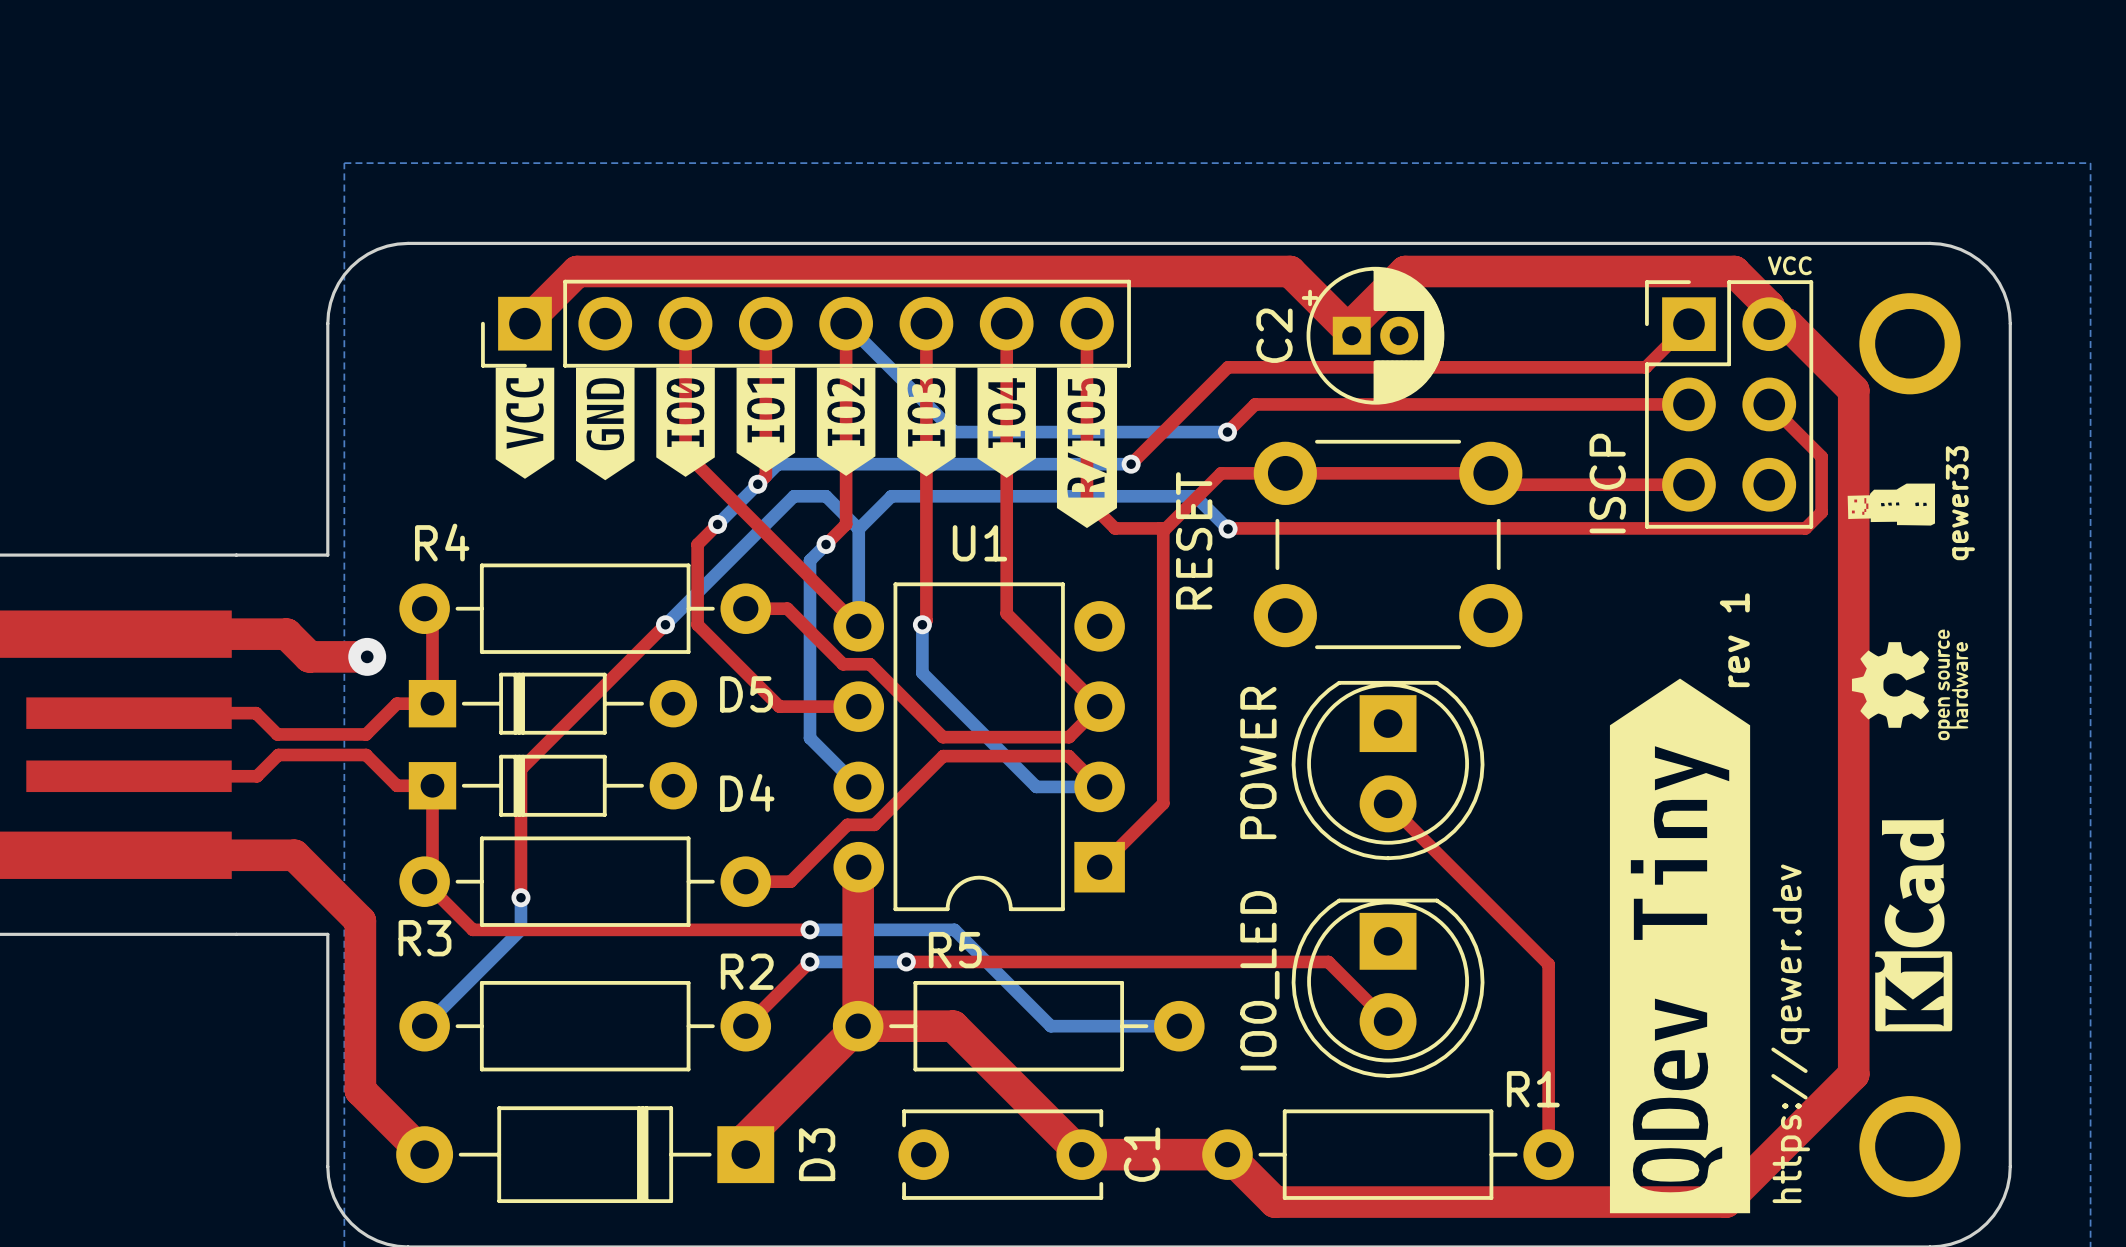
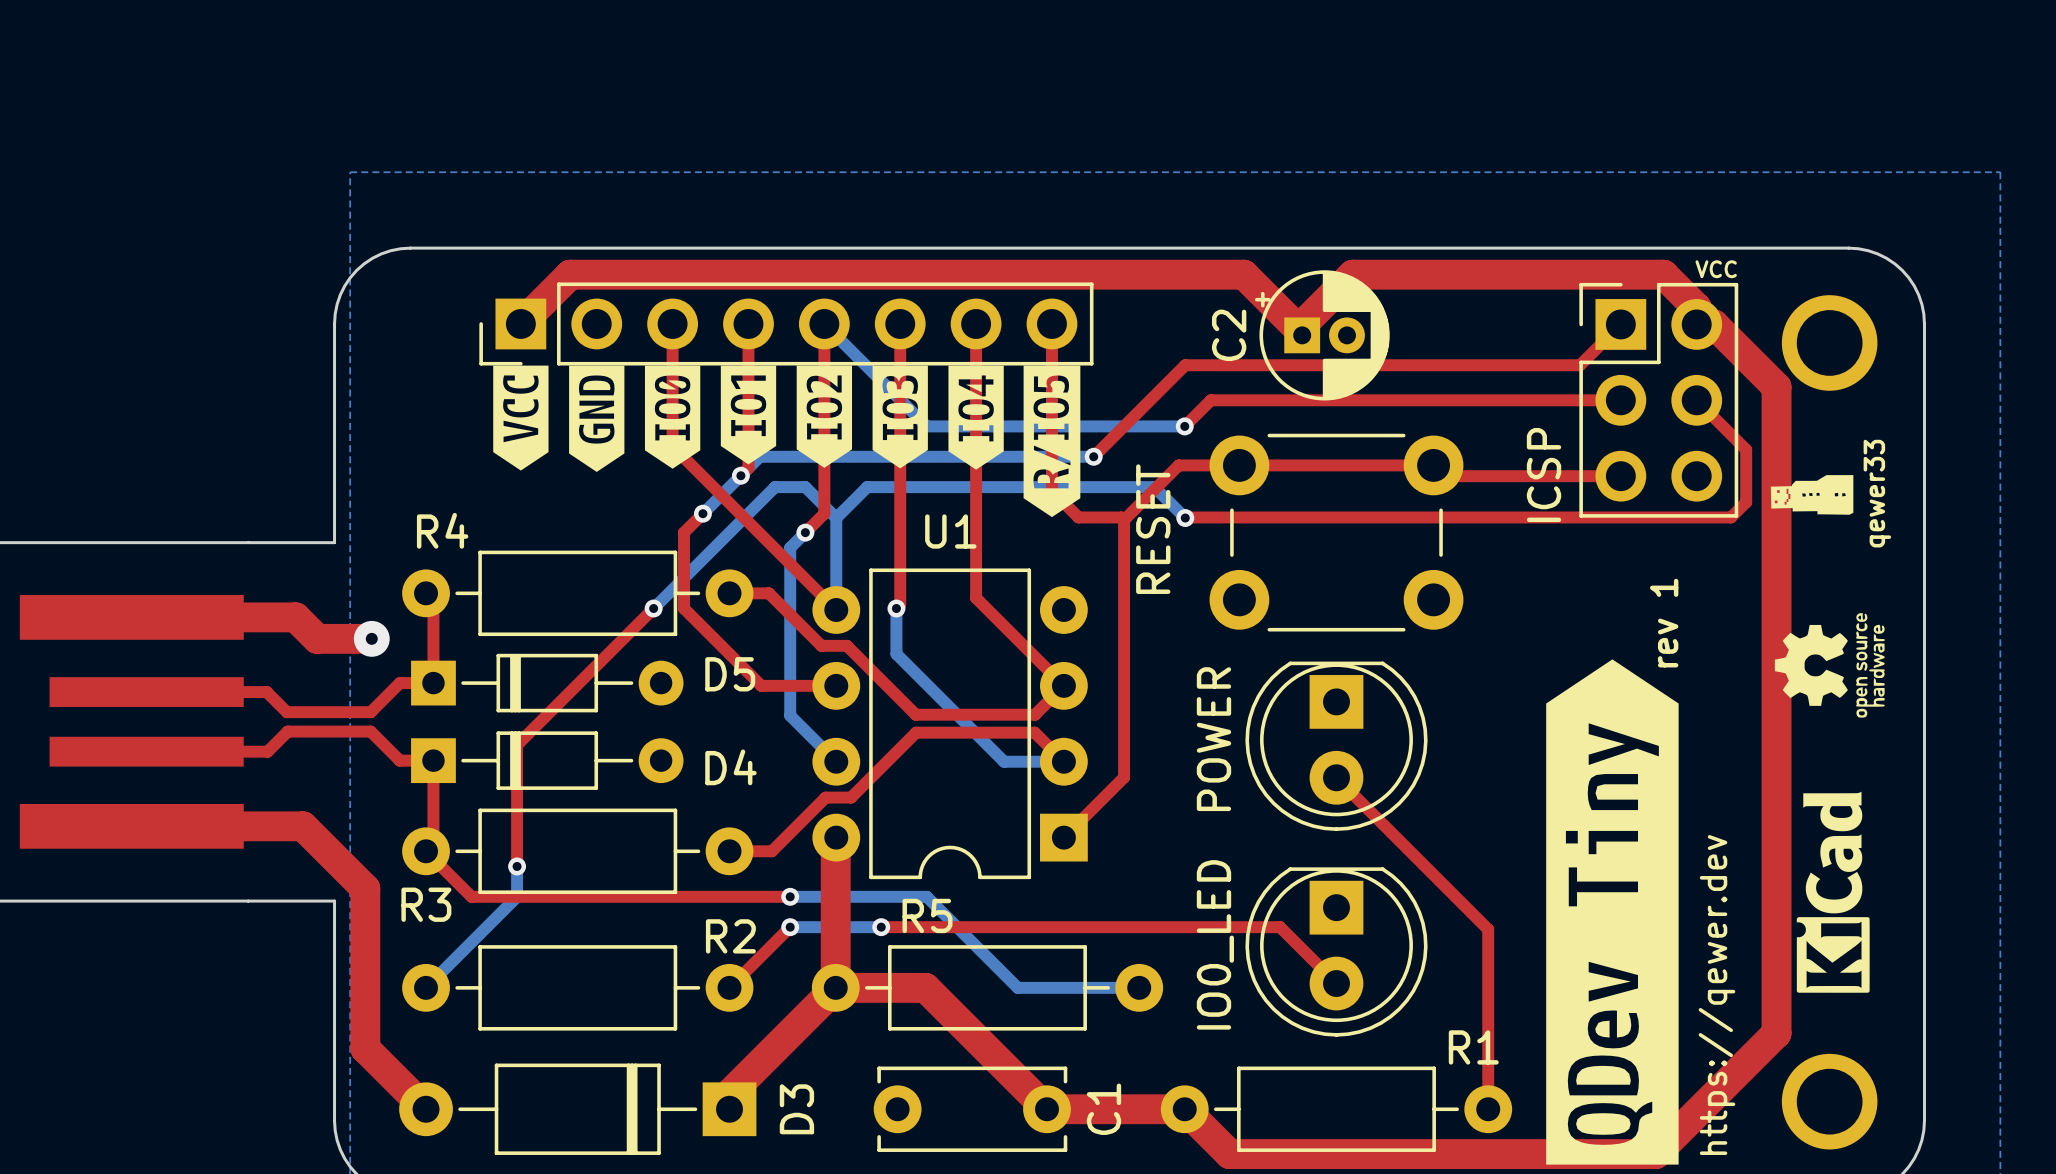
part value: ISCP (1607, 483) -> ICSP (1544, 475)

